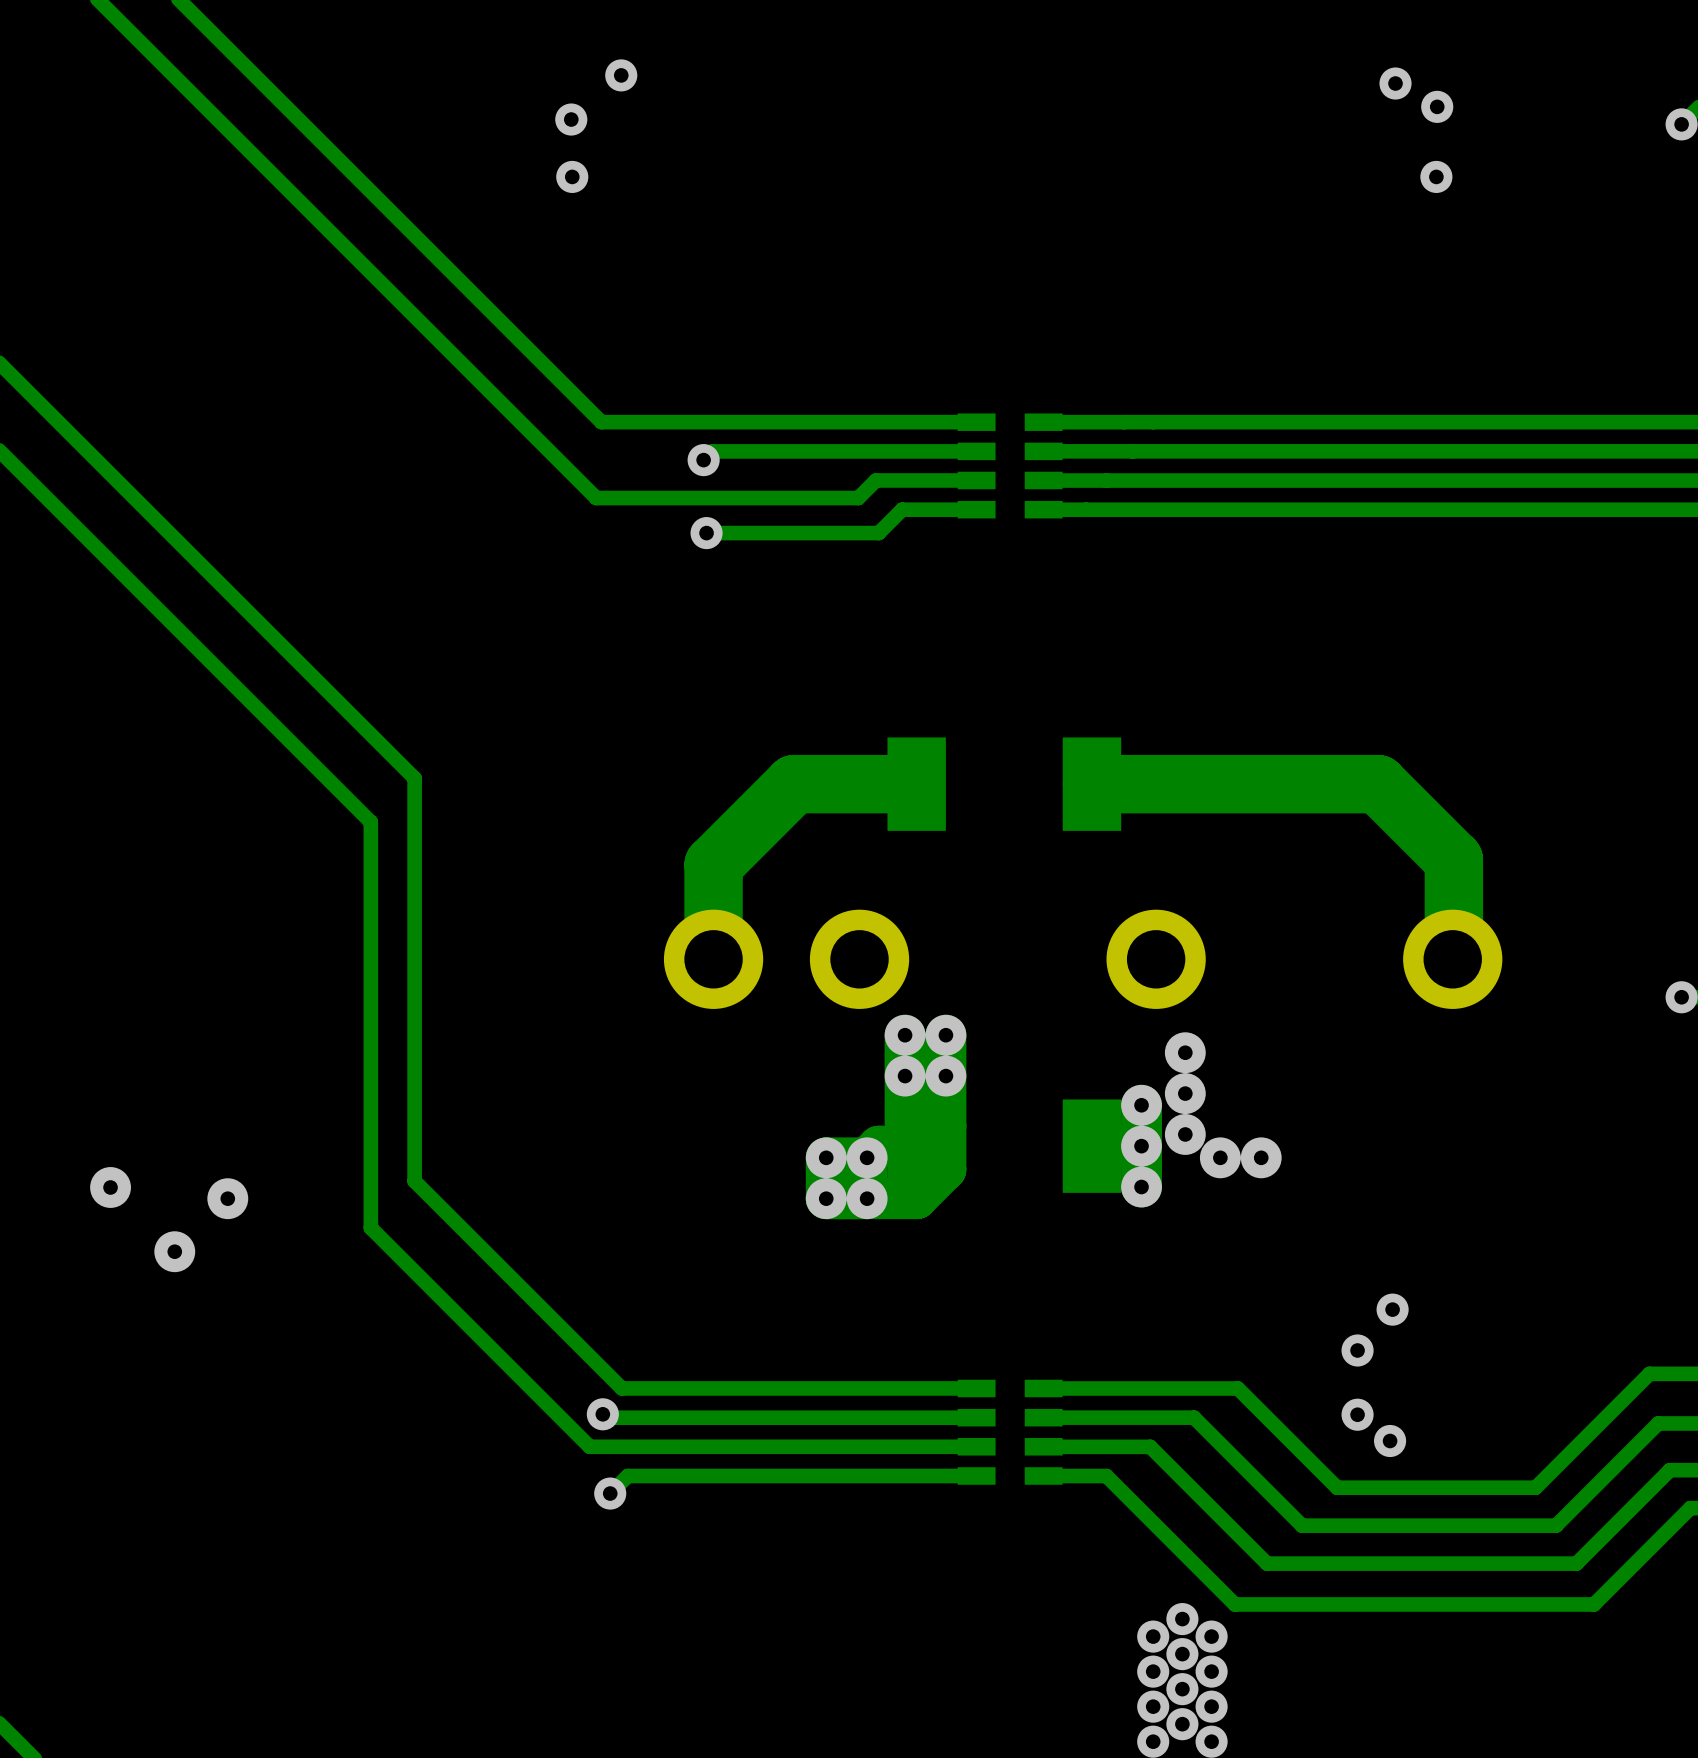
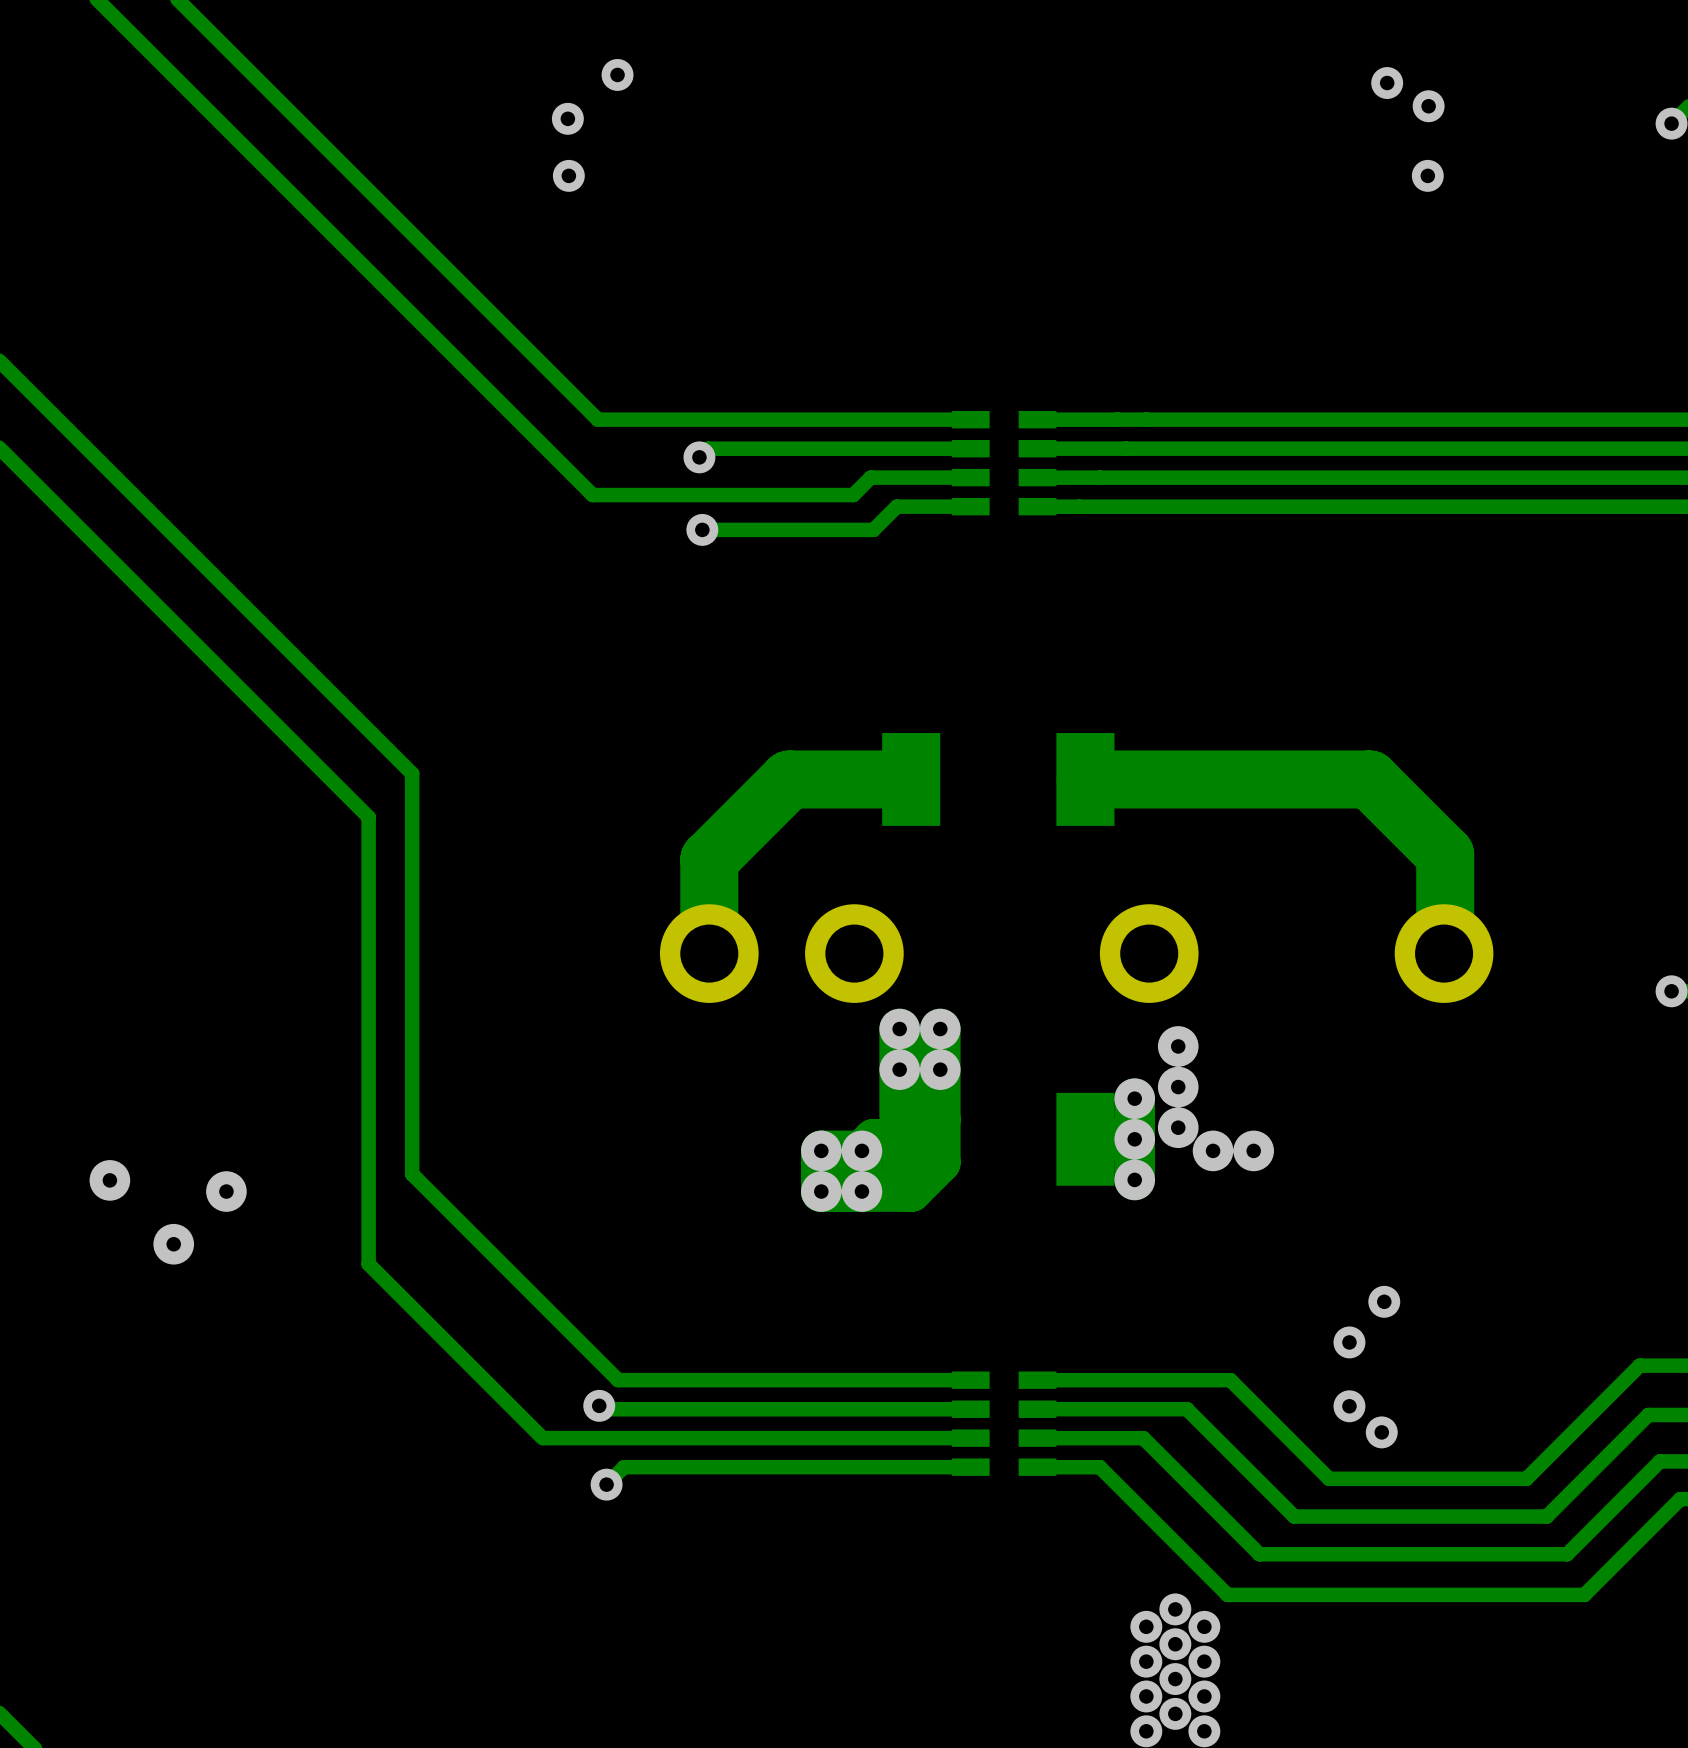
track: (370, 1227) (589, 1446) -> (368, 1220) (368, 1264) (542, 1438)
track: none -> (586, 1438) (544, 1438)

